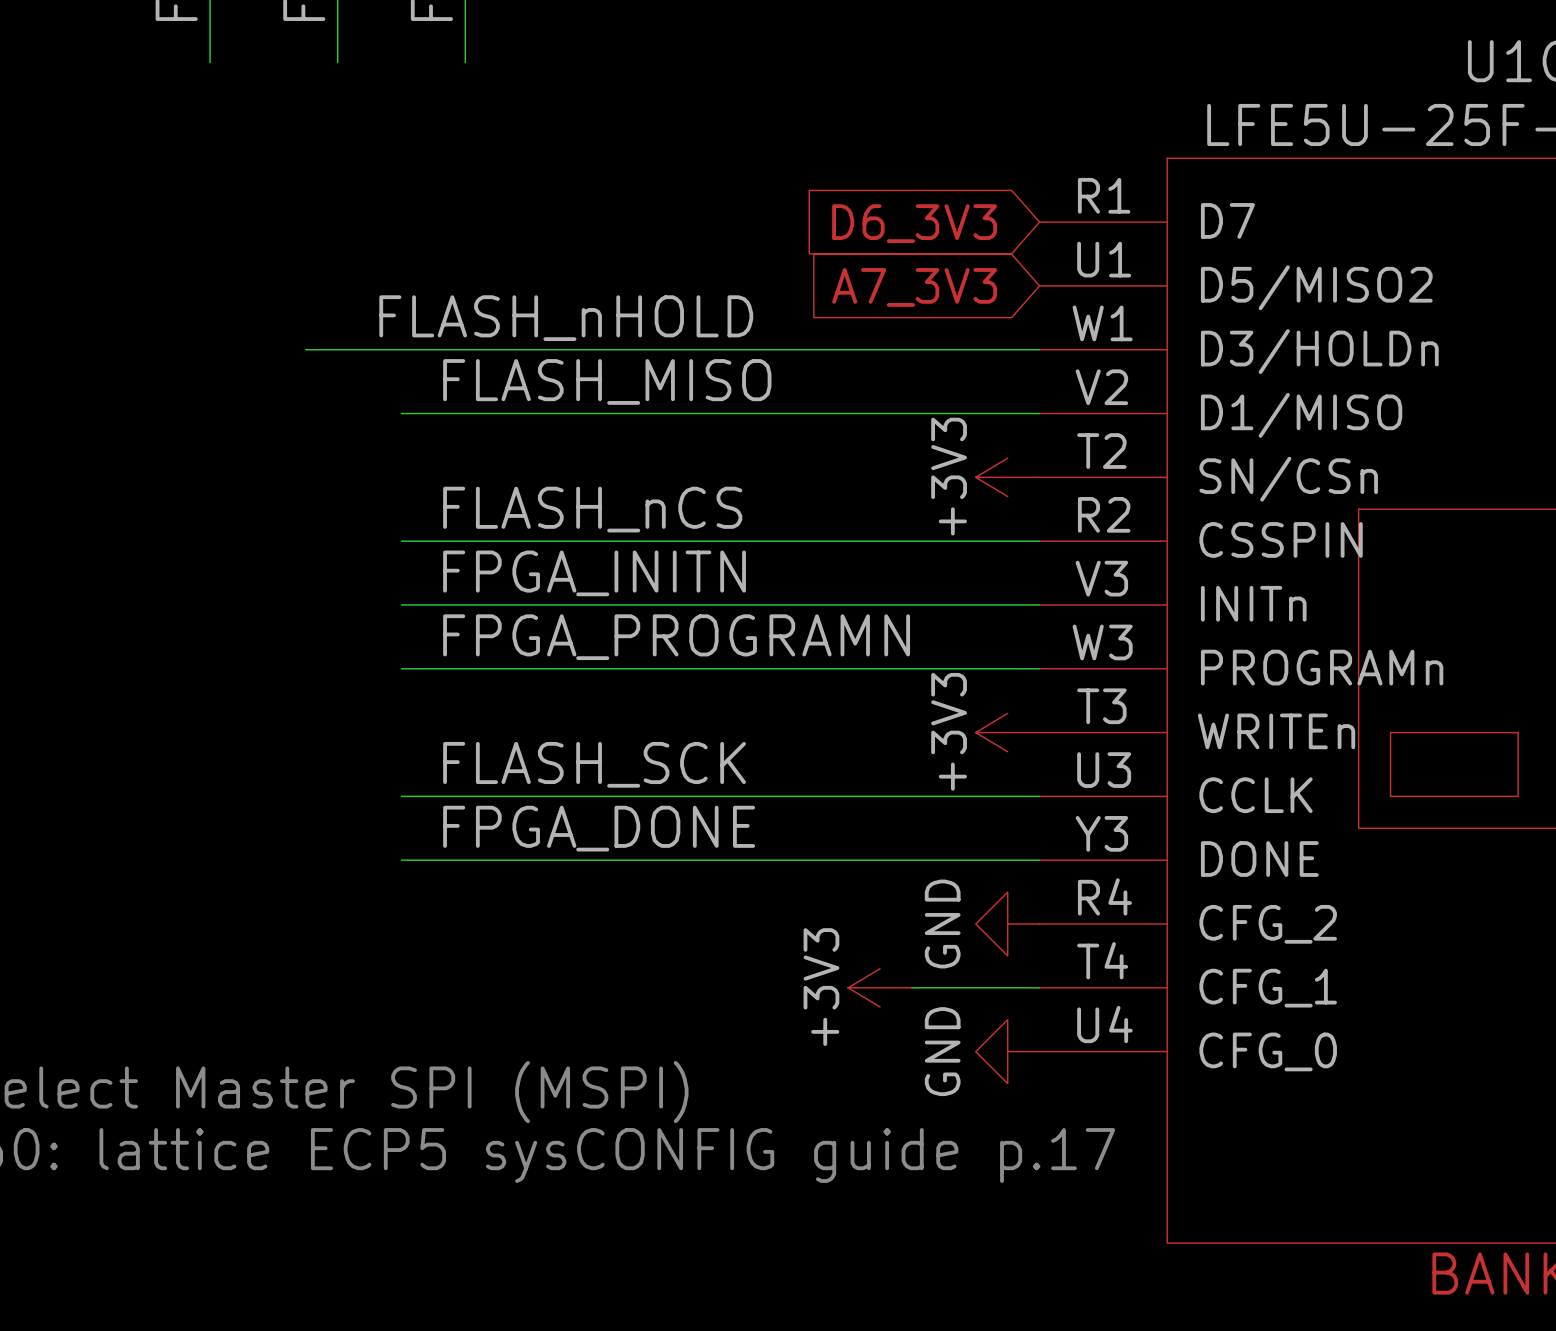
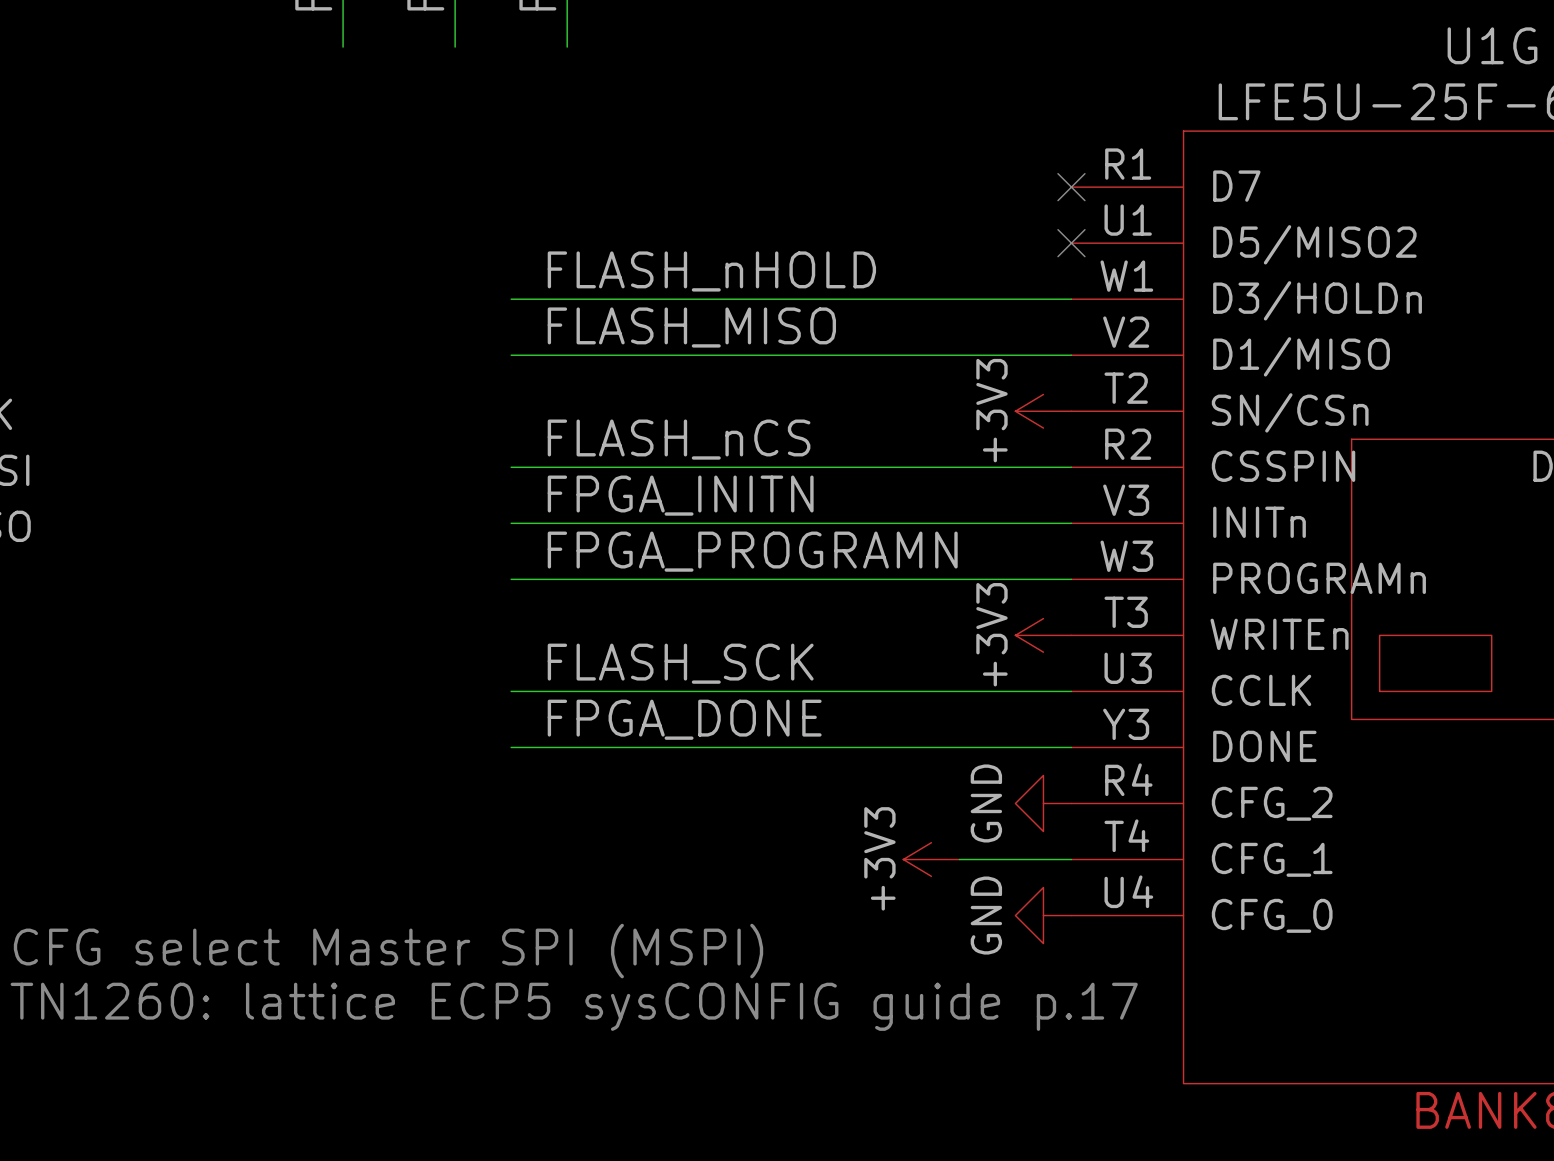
no-connect mark: none -> (1071, 187)
global label: D6_3V3 (914, 223) -> none
no-connect mark: none -> (1071, 243)
global label: A7_3V3 (914, 287) -> none
label position: FLASH_nHOLD (566, 318) -> FLASH_nHOLD (711, 271)
wire: (305, 349) (401, 349) -> none

